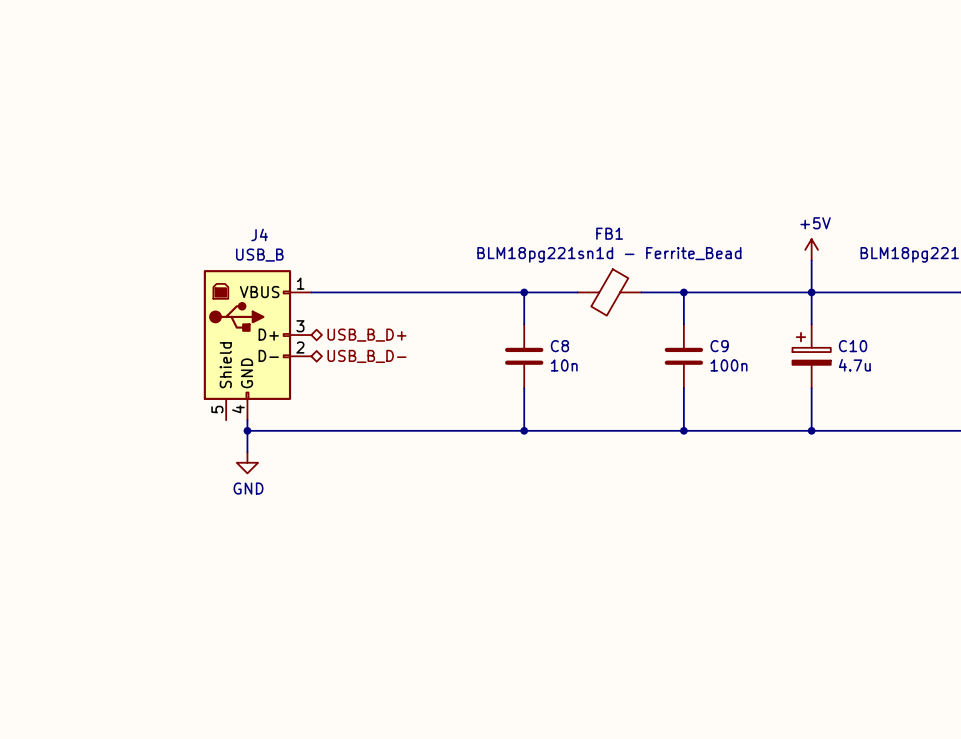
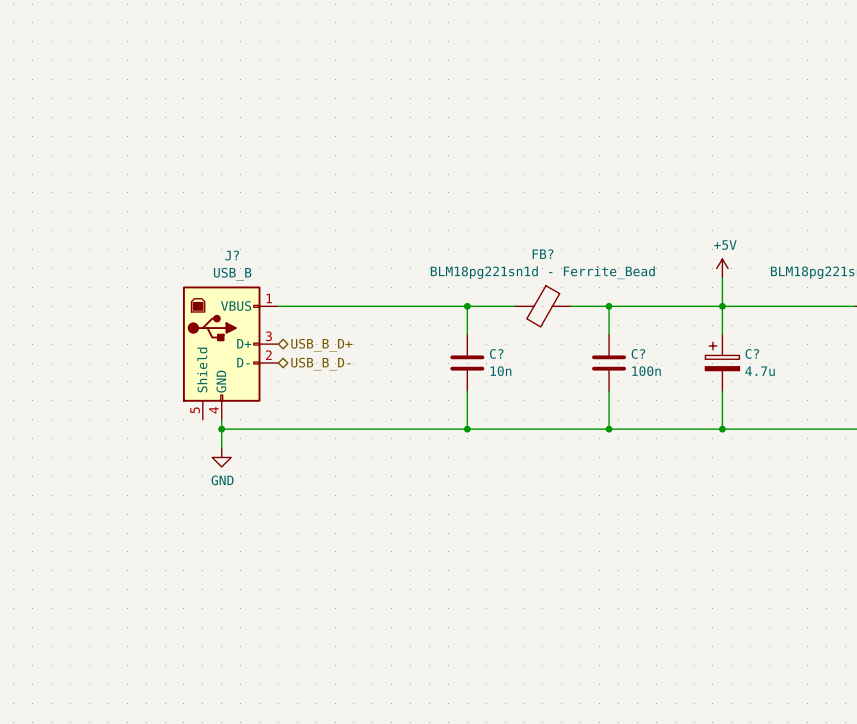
FB1 name: FB1 (609, 233) -> FB? (543, 254)
J4 name: J4 (259, 234) -> J? (232, 255)
C8 name: C8 (559, 346) -> C? (496, 353)
C9 name: C9 (719, 346) -> C? (638, 353)
C10 name: C10 (853, 346) -> C? (752, 353)

